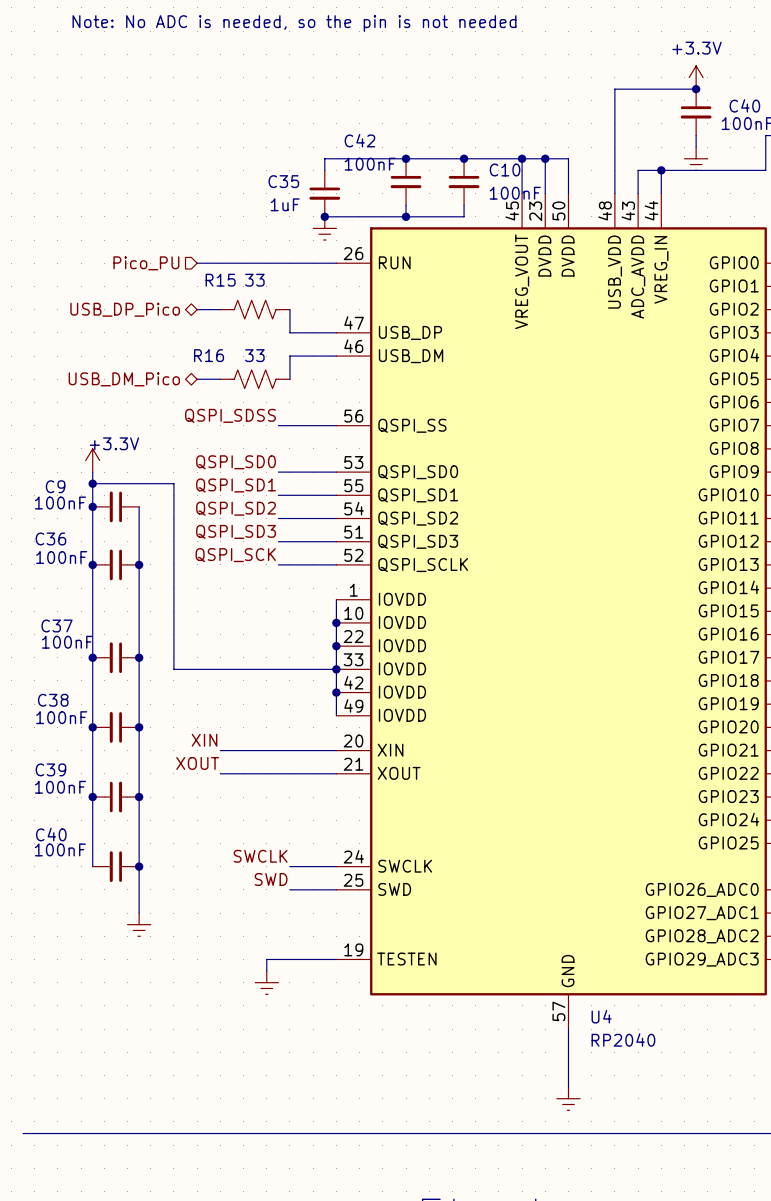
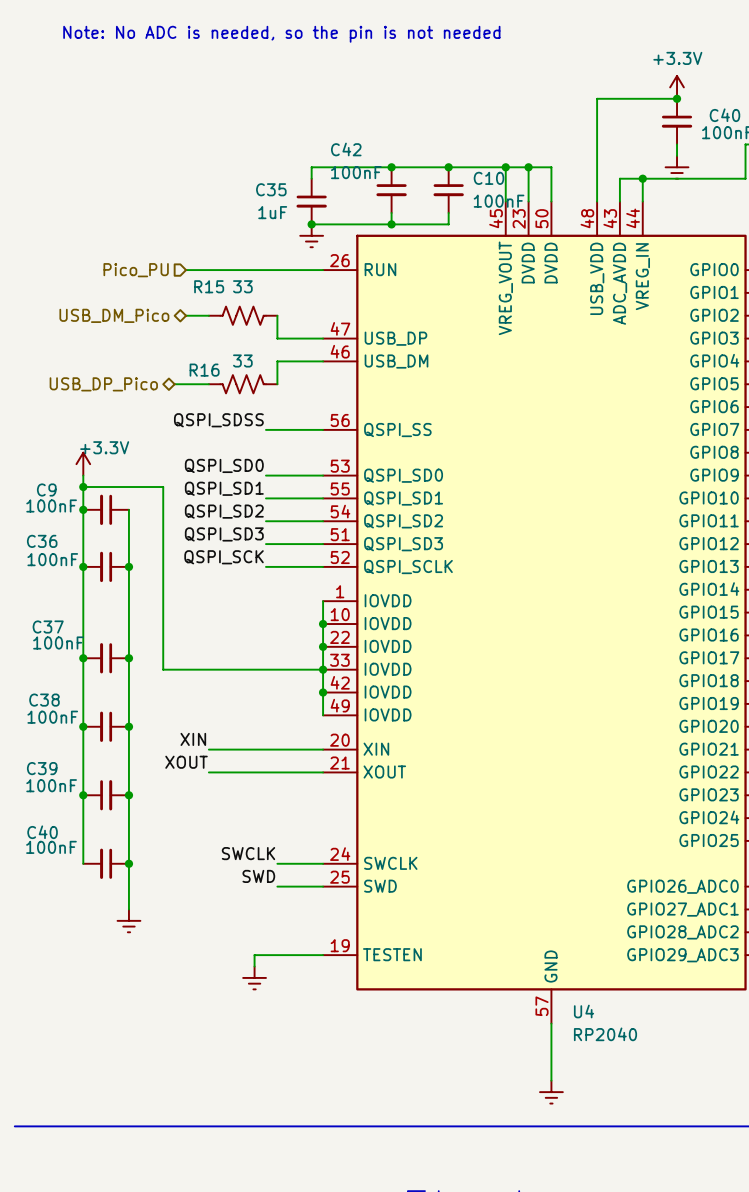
hierarchical label: USB_DP_Pico (125, 309) -> USB_DM_Pico (114, 315)
hierarchical label: USB_DM_Pico (124, 379) -> USB_DP_Pico (103, 384)
wire: none -> (174, 384) (186, 384)
R16 flip: as is (255, 379) -> left-right (243, 384)

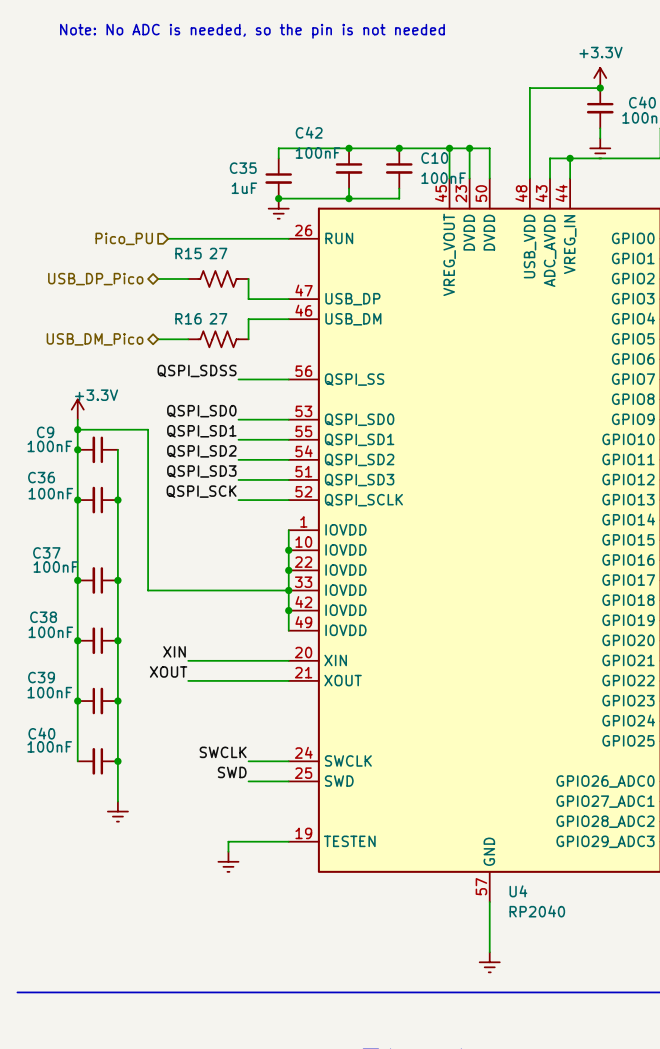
R15 value: 33 (242, 286) -> 27 (218, 253)
hierarchical label: USB_DM_Pico (114, 315) -> USB_DP_Pico (95, 279)
wire: none -> (158, 278) (168, 278)
R16 value: 33 (242, 360) -> 27 (218, 318)
hierarchical label: USB_DP_Pico (103, 384) -> USB_DM_Pico (95, 339)
R16 flip: as is (243, 384) -> left-right (218, 339)

